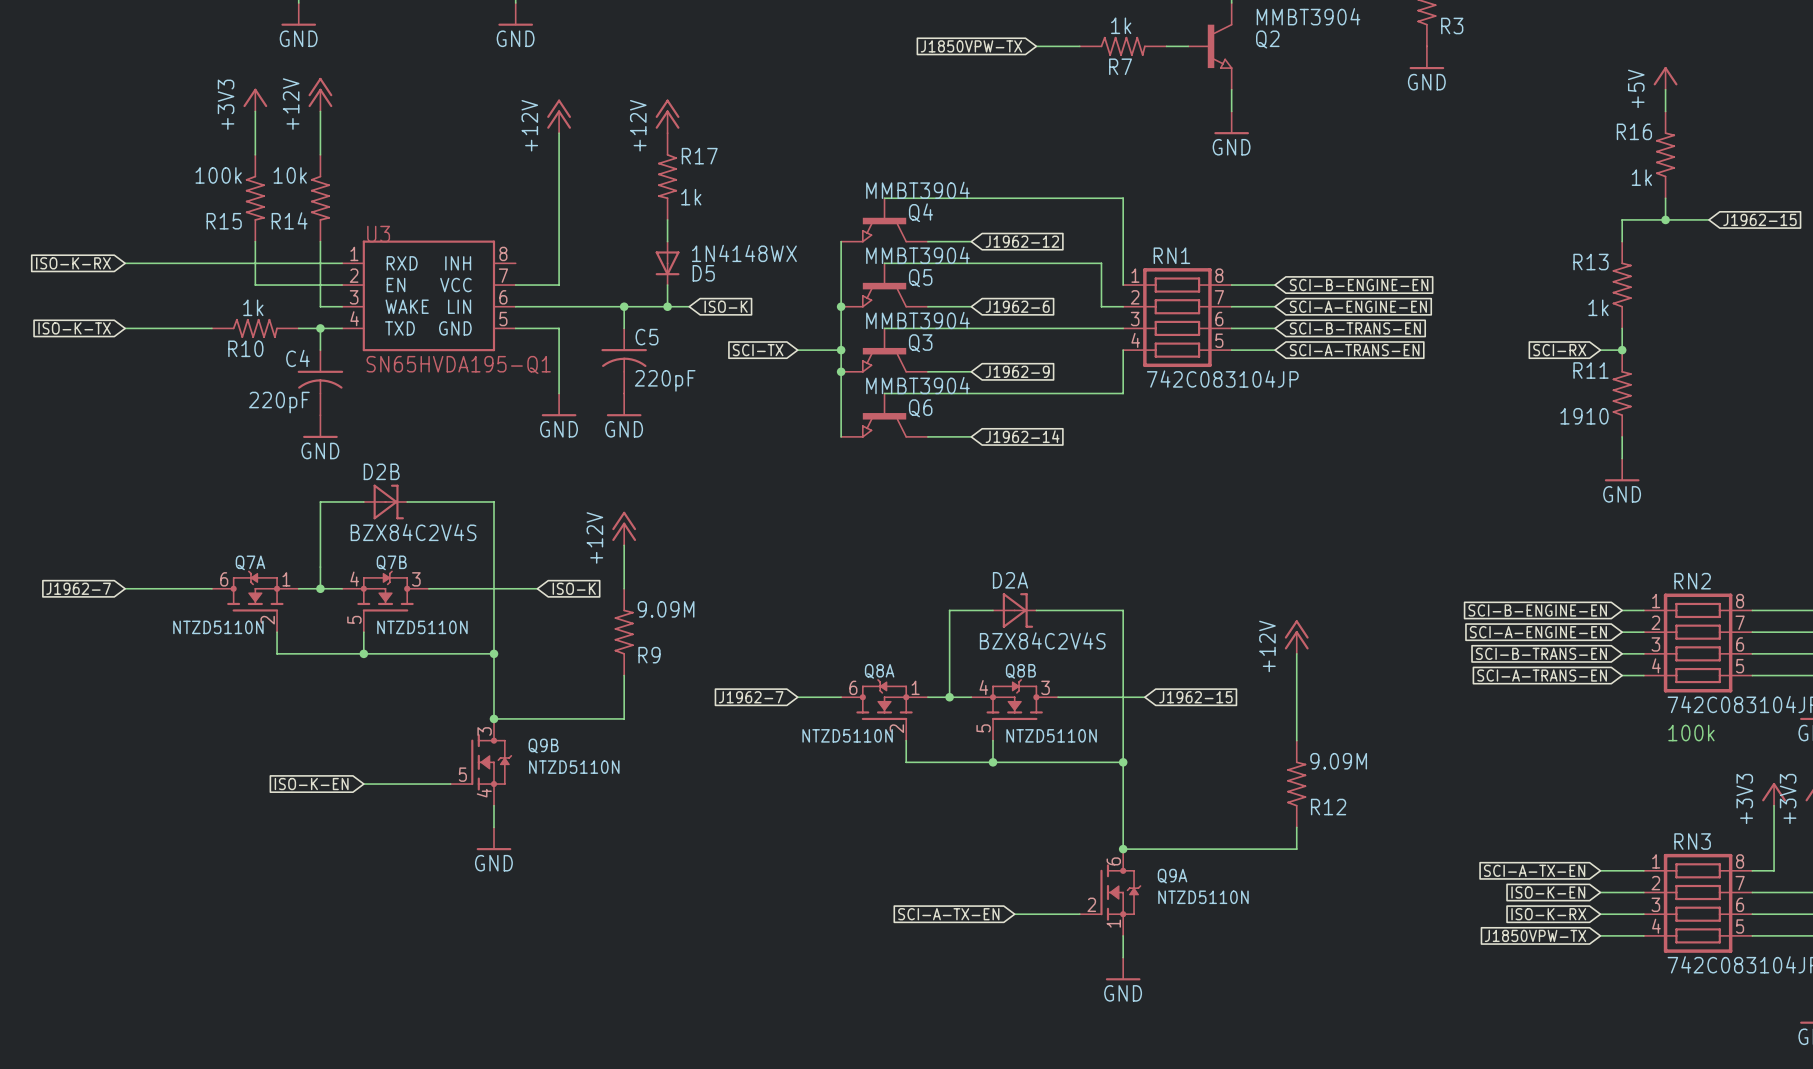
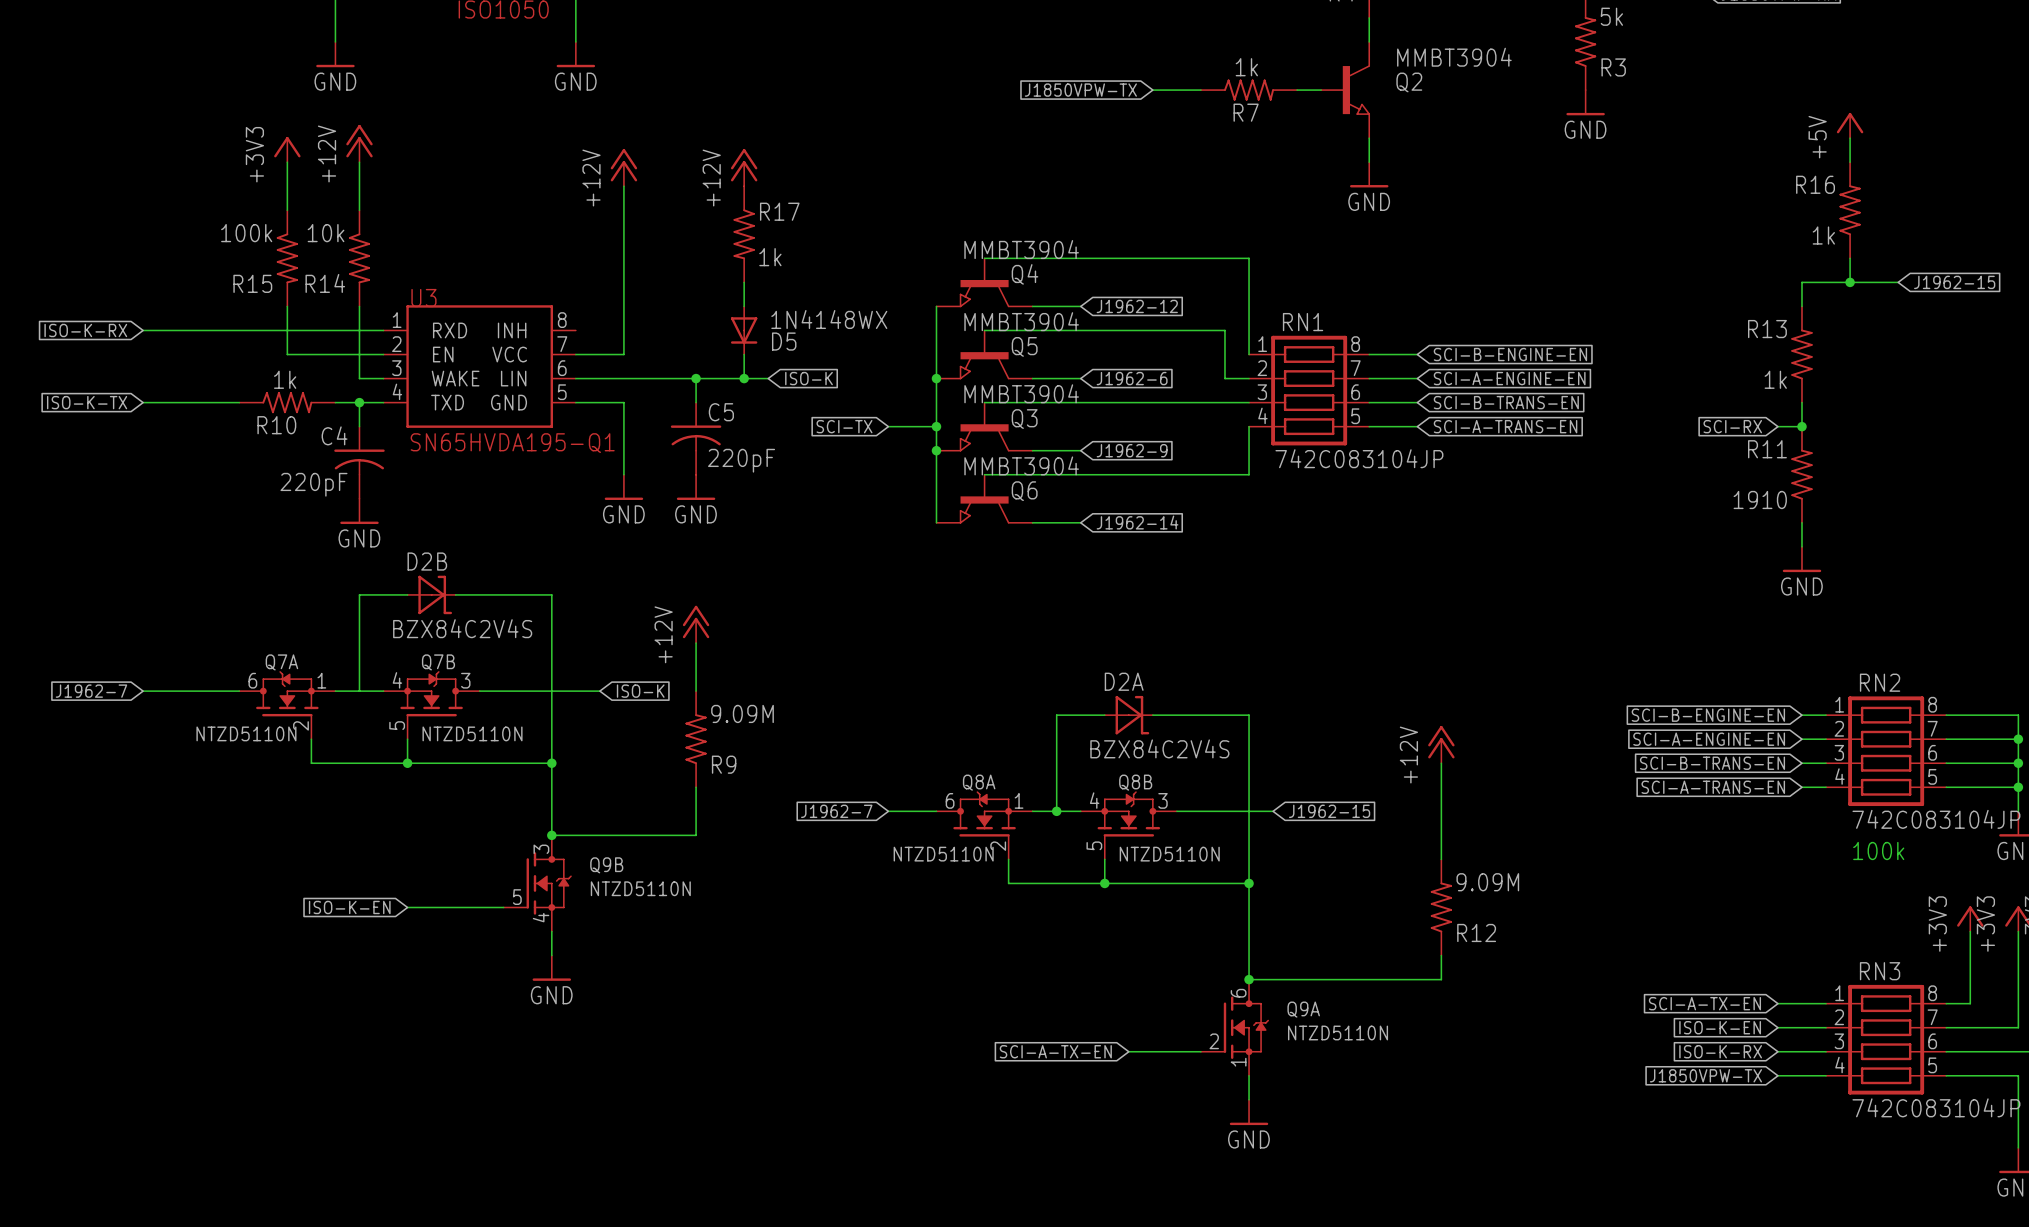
junction: (320, 588) -> none

